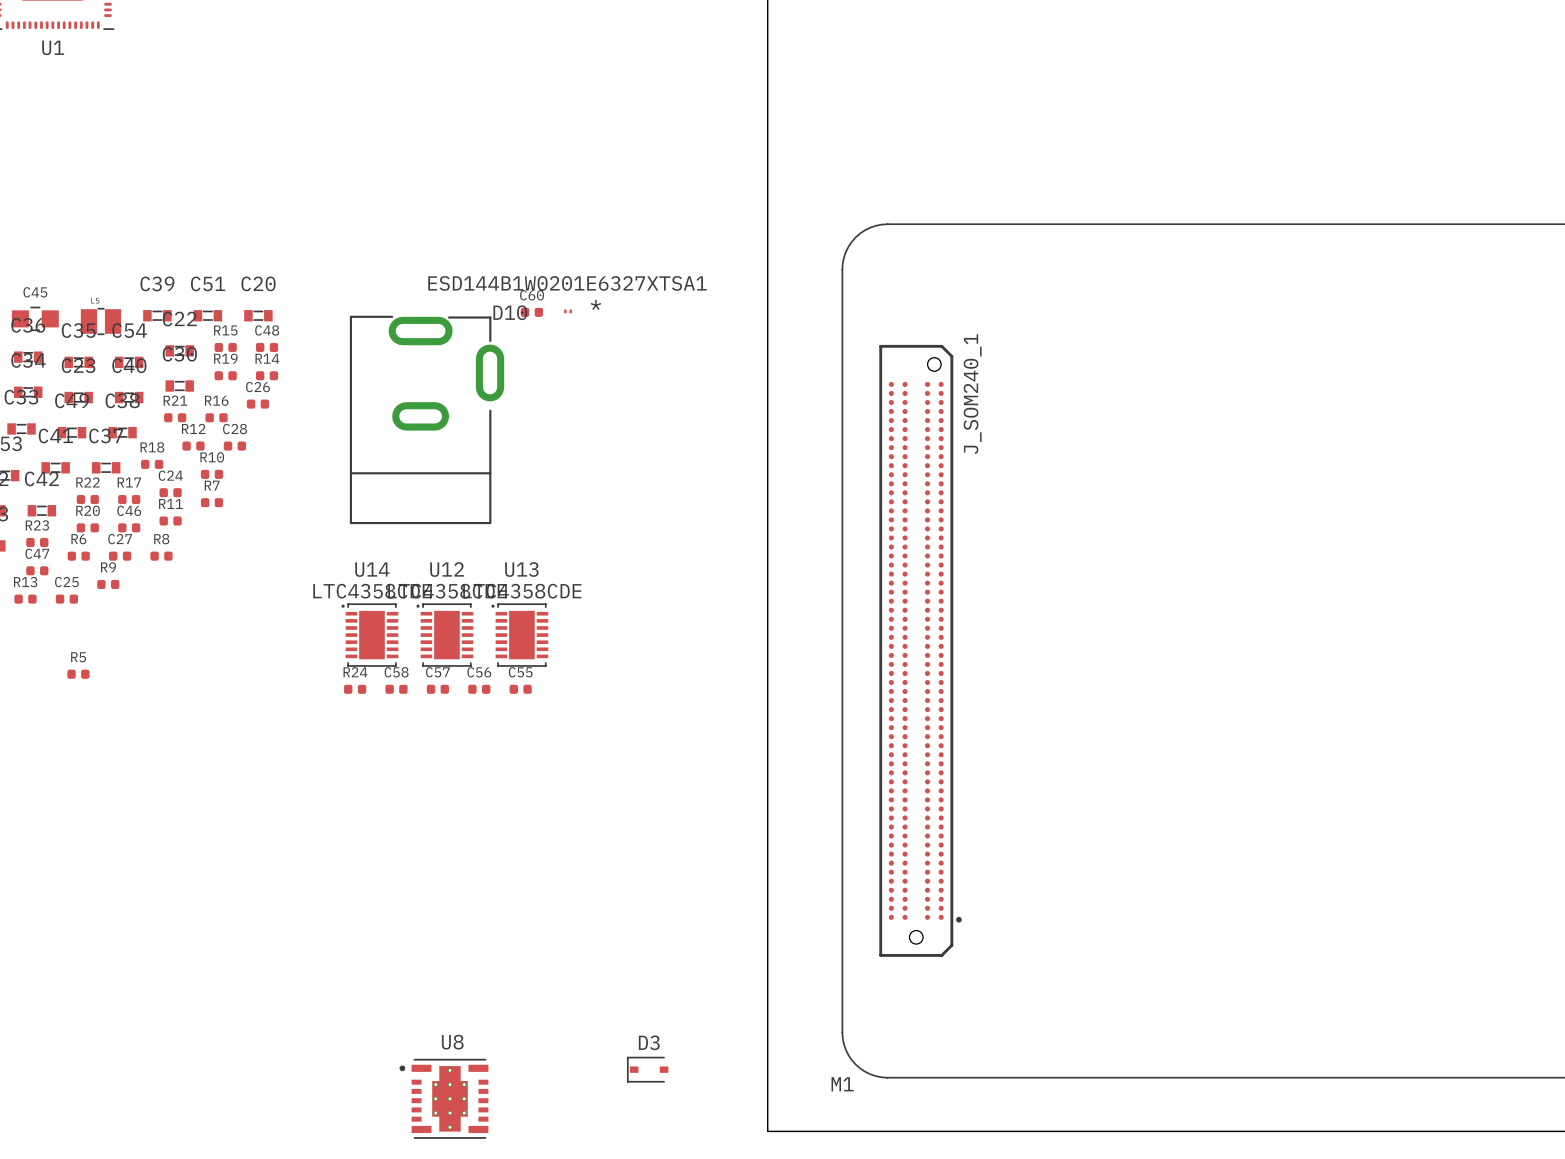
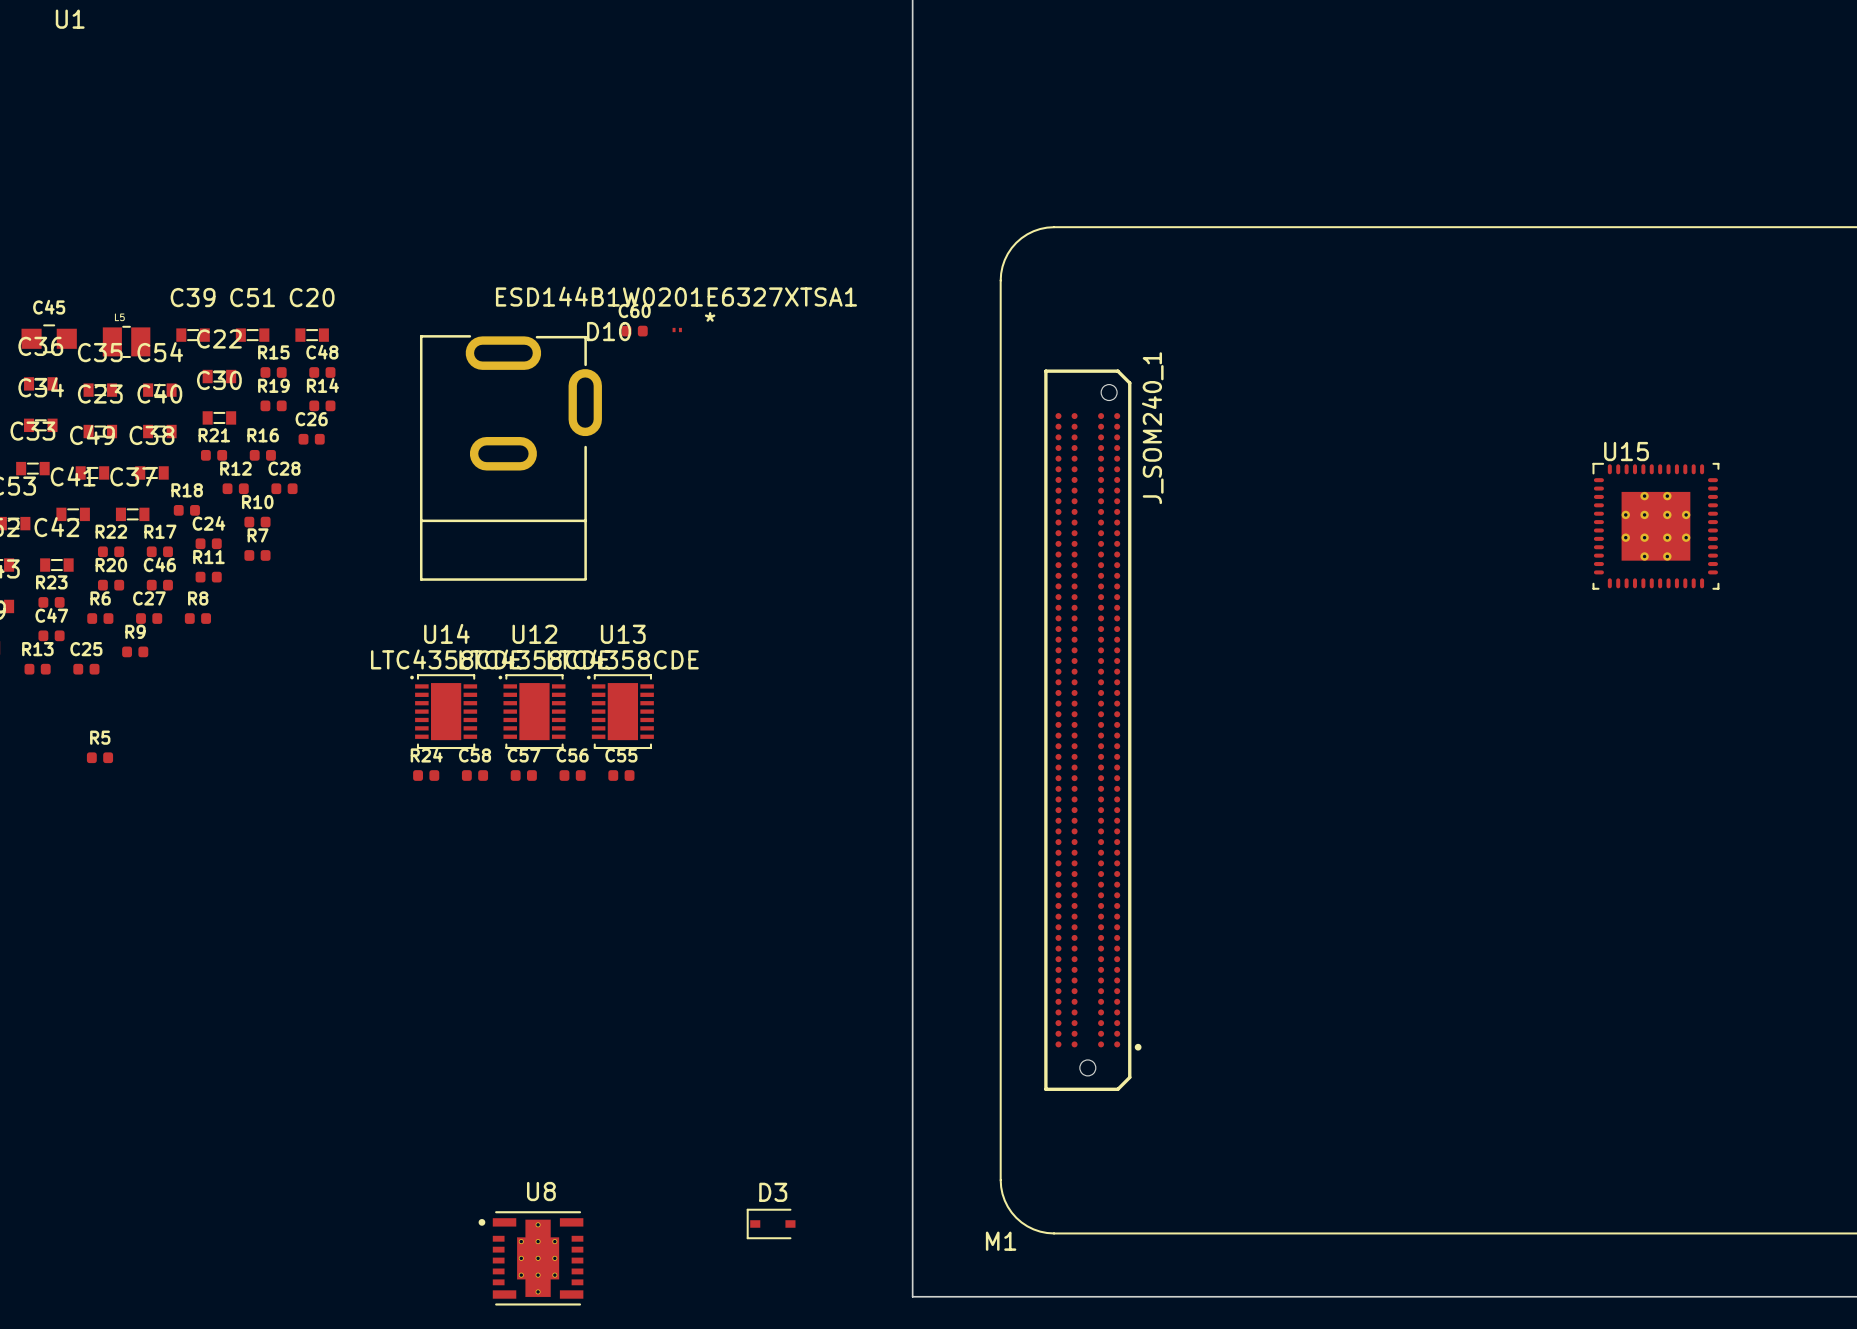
U15: none -> (1655, 526)

